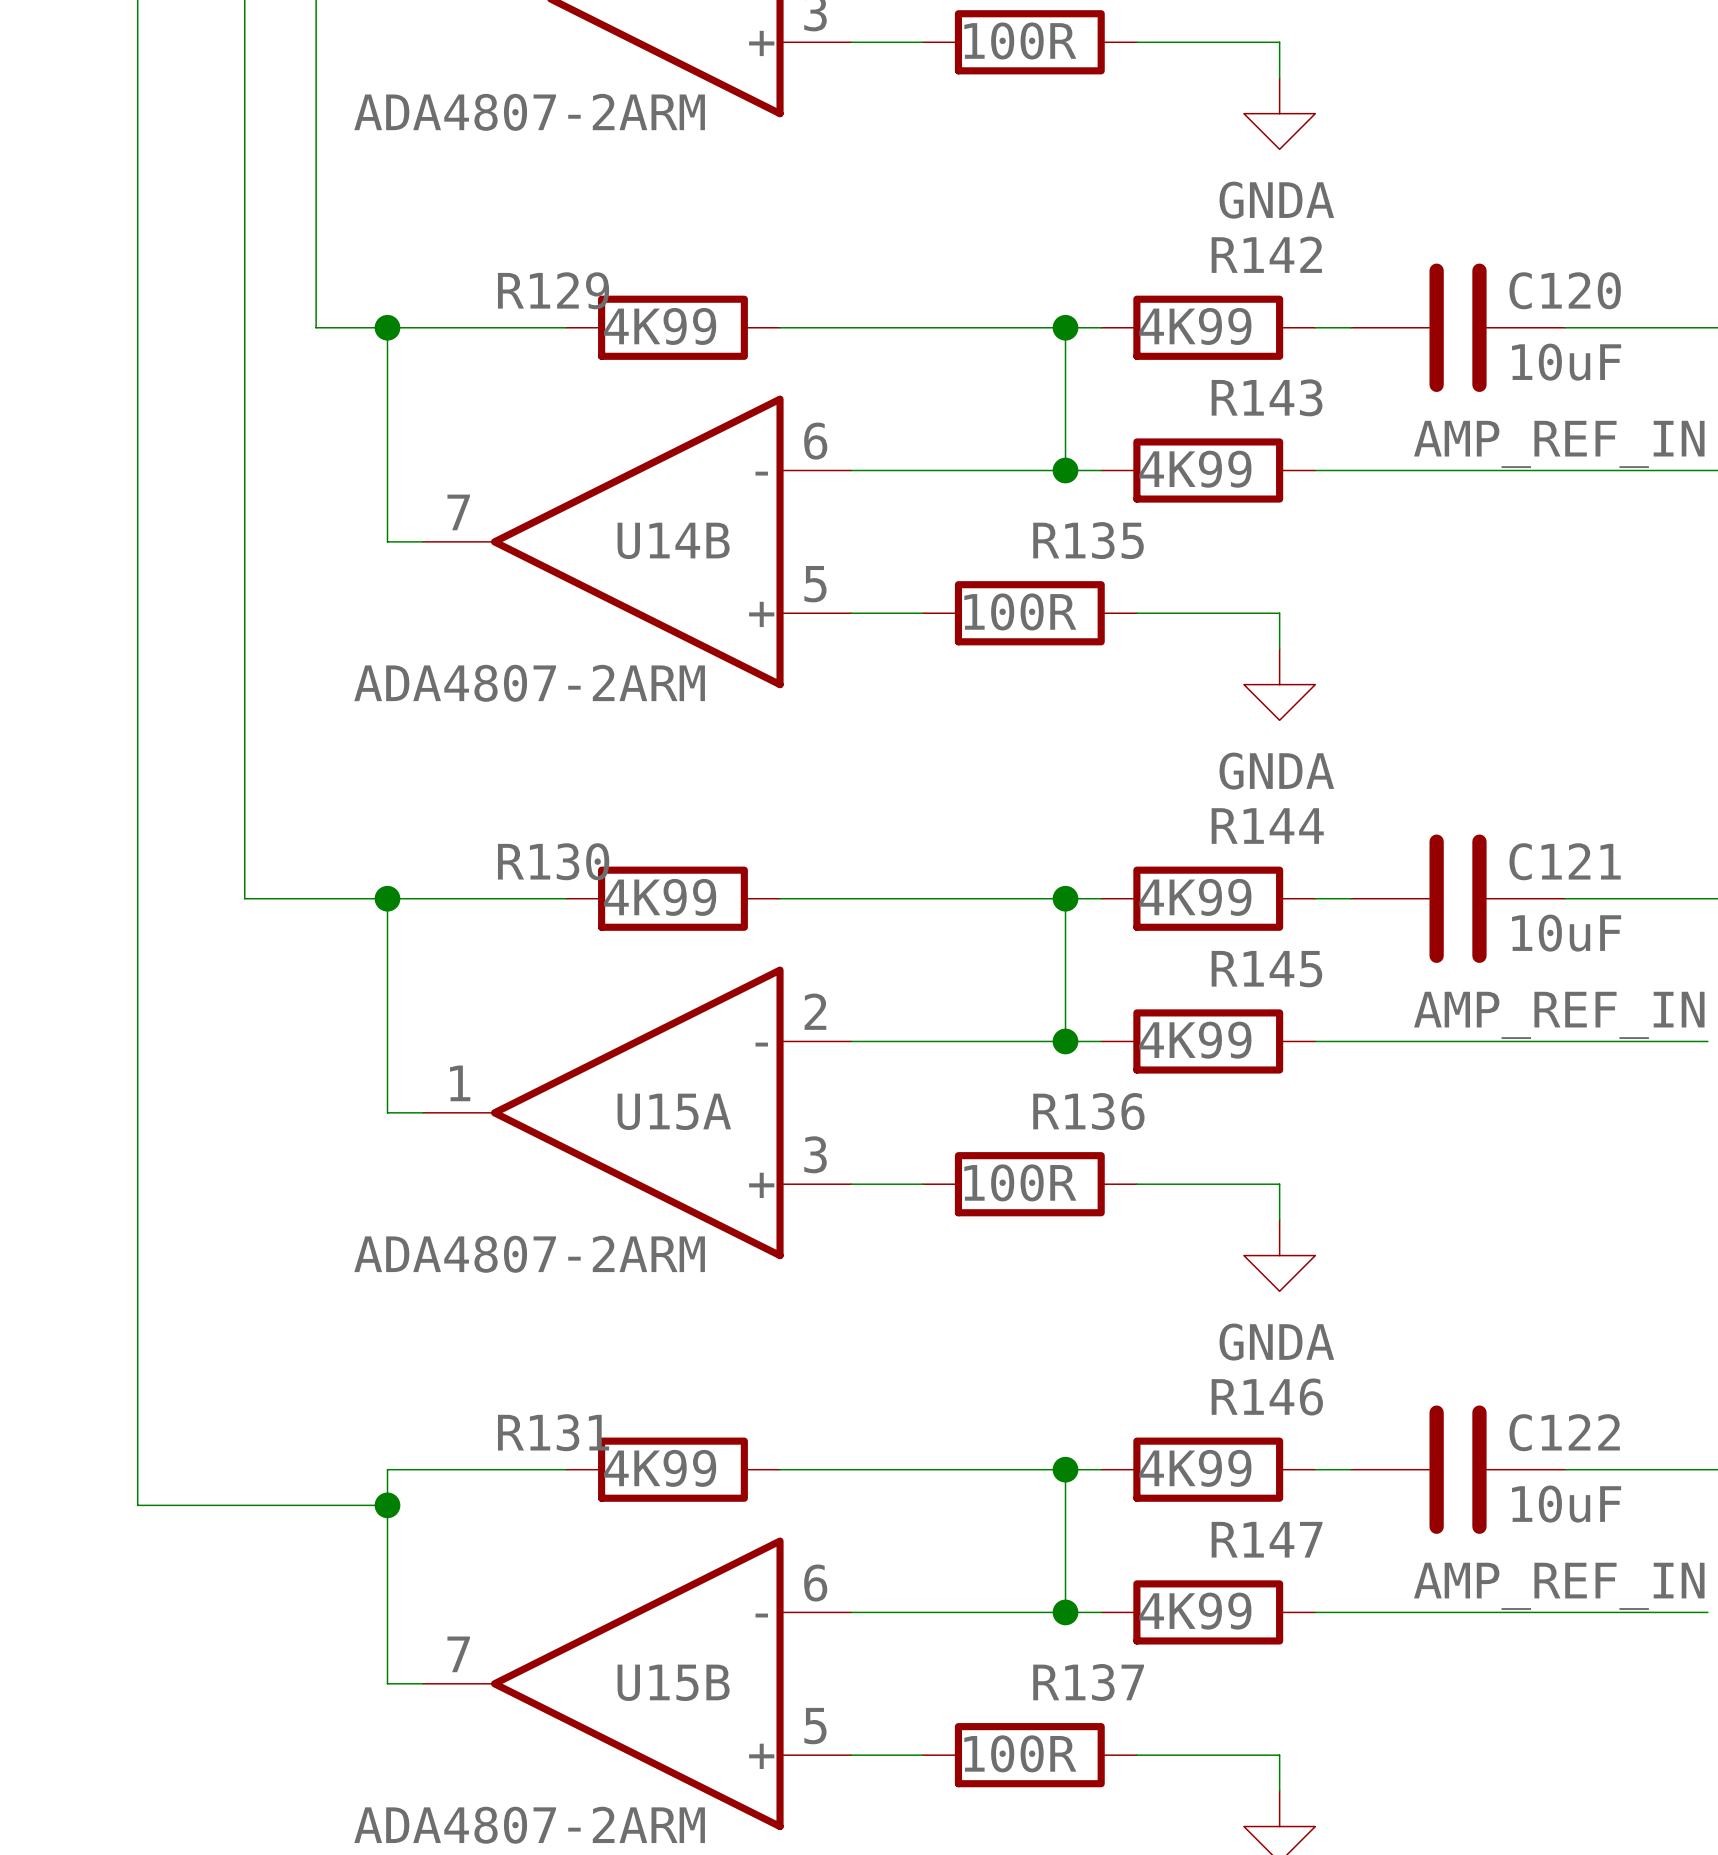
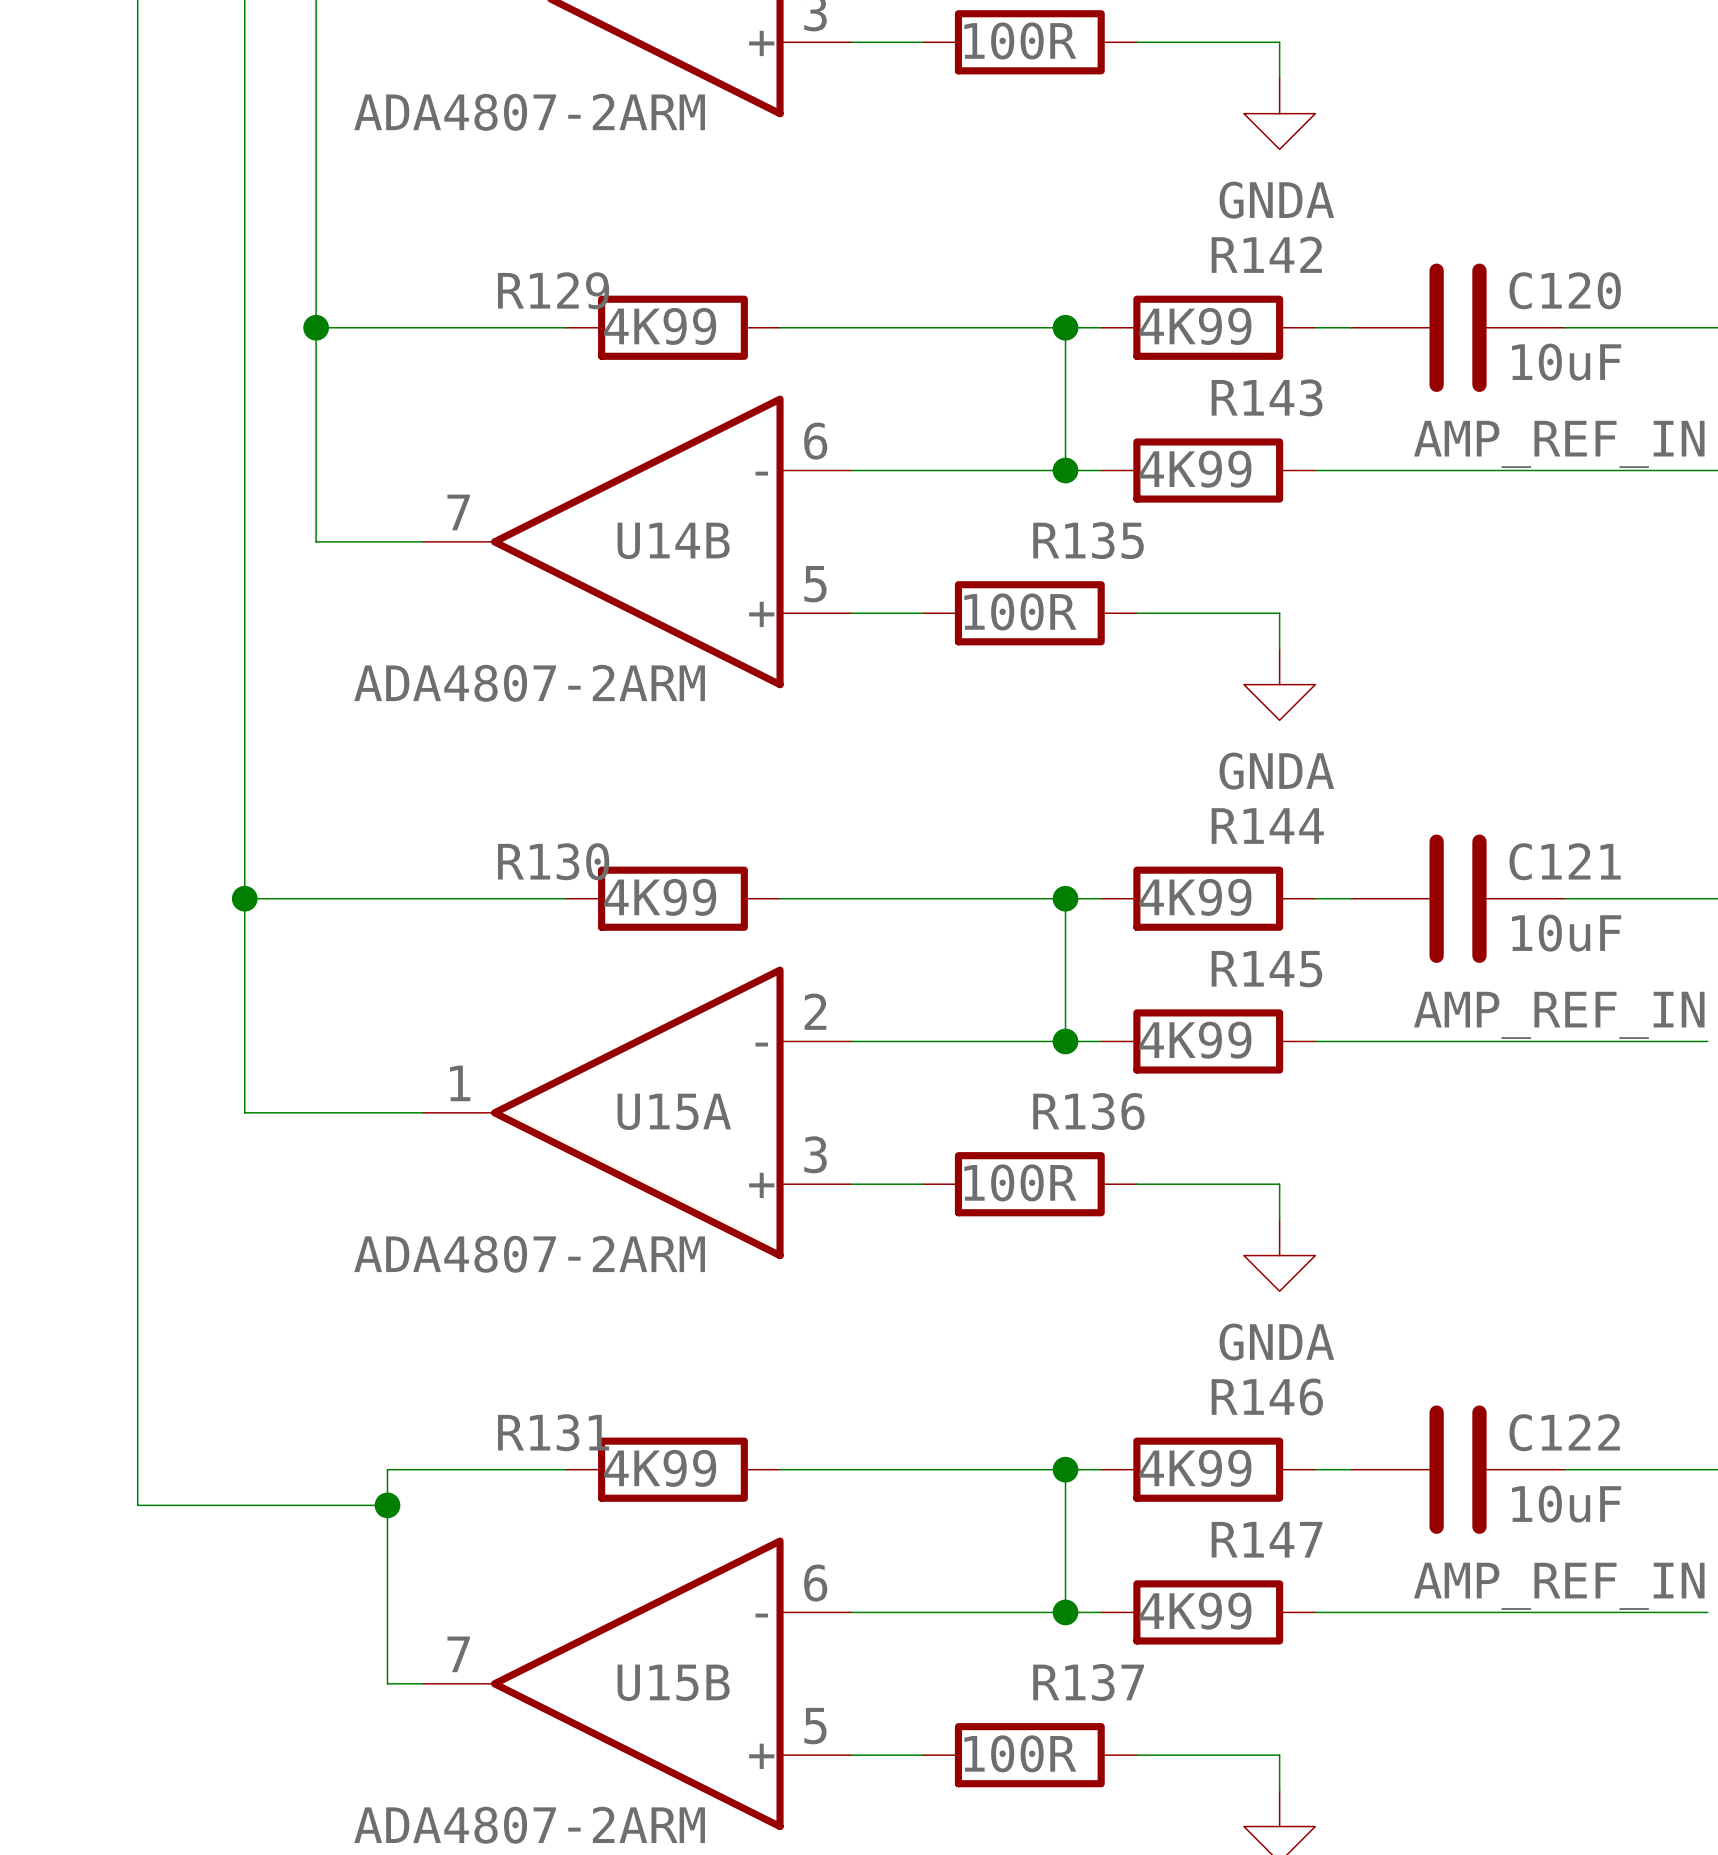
wire: (387, 327) (387, 541) -> (316, 327) (316, 541) (387, 541)
junction position: (387, 327) -> (316, 327)
wire: (387, 898) (387, 1112) -> (244, 898) (244, 1112) (387, 1112)
junction position: (387, 898) -> (244, 898)

